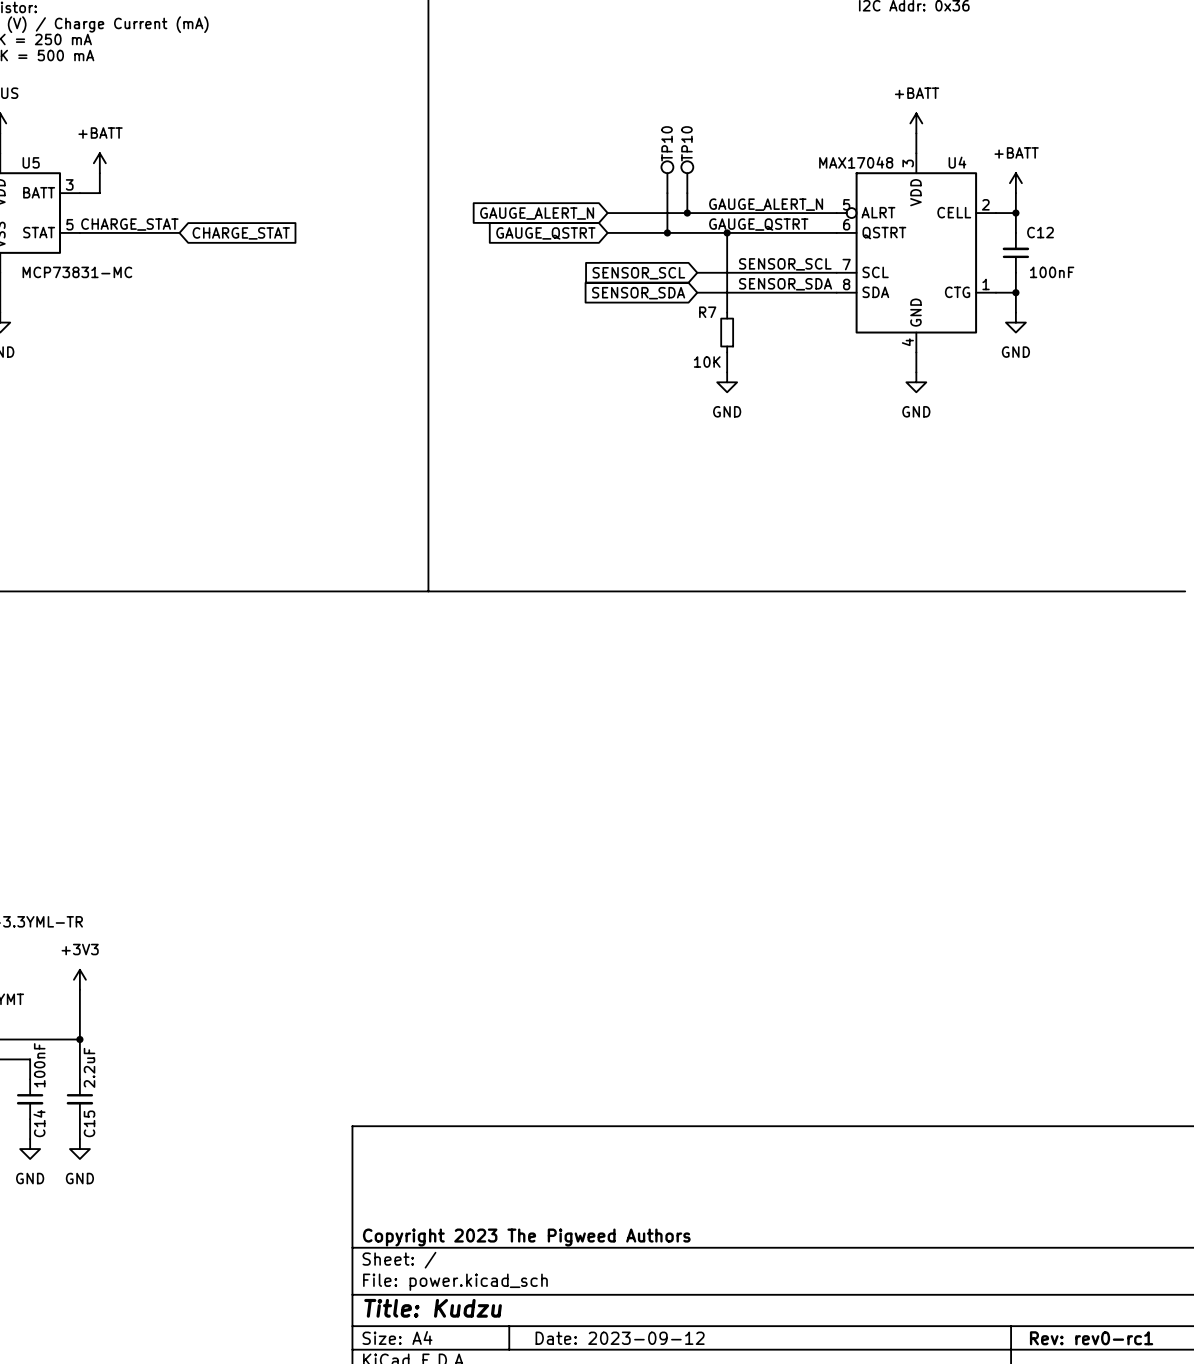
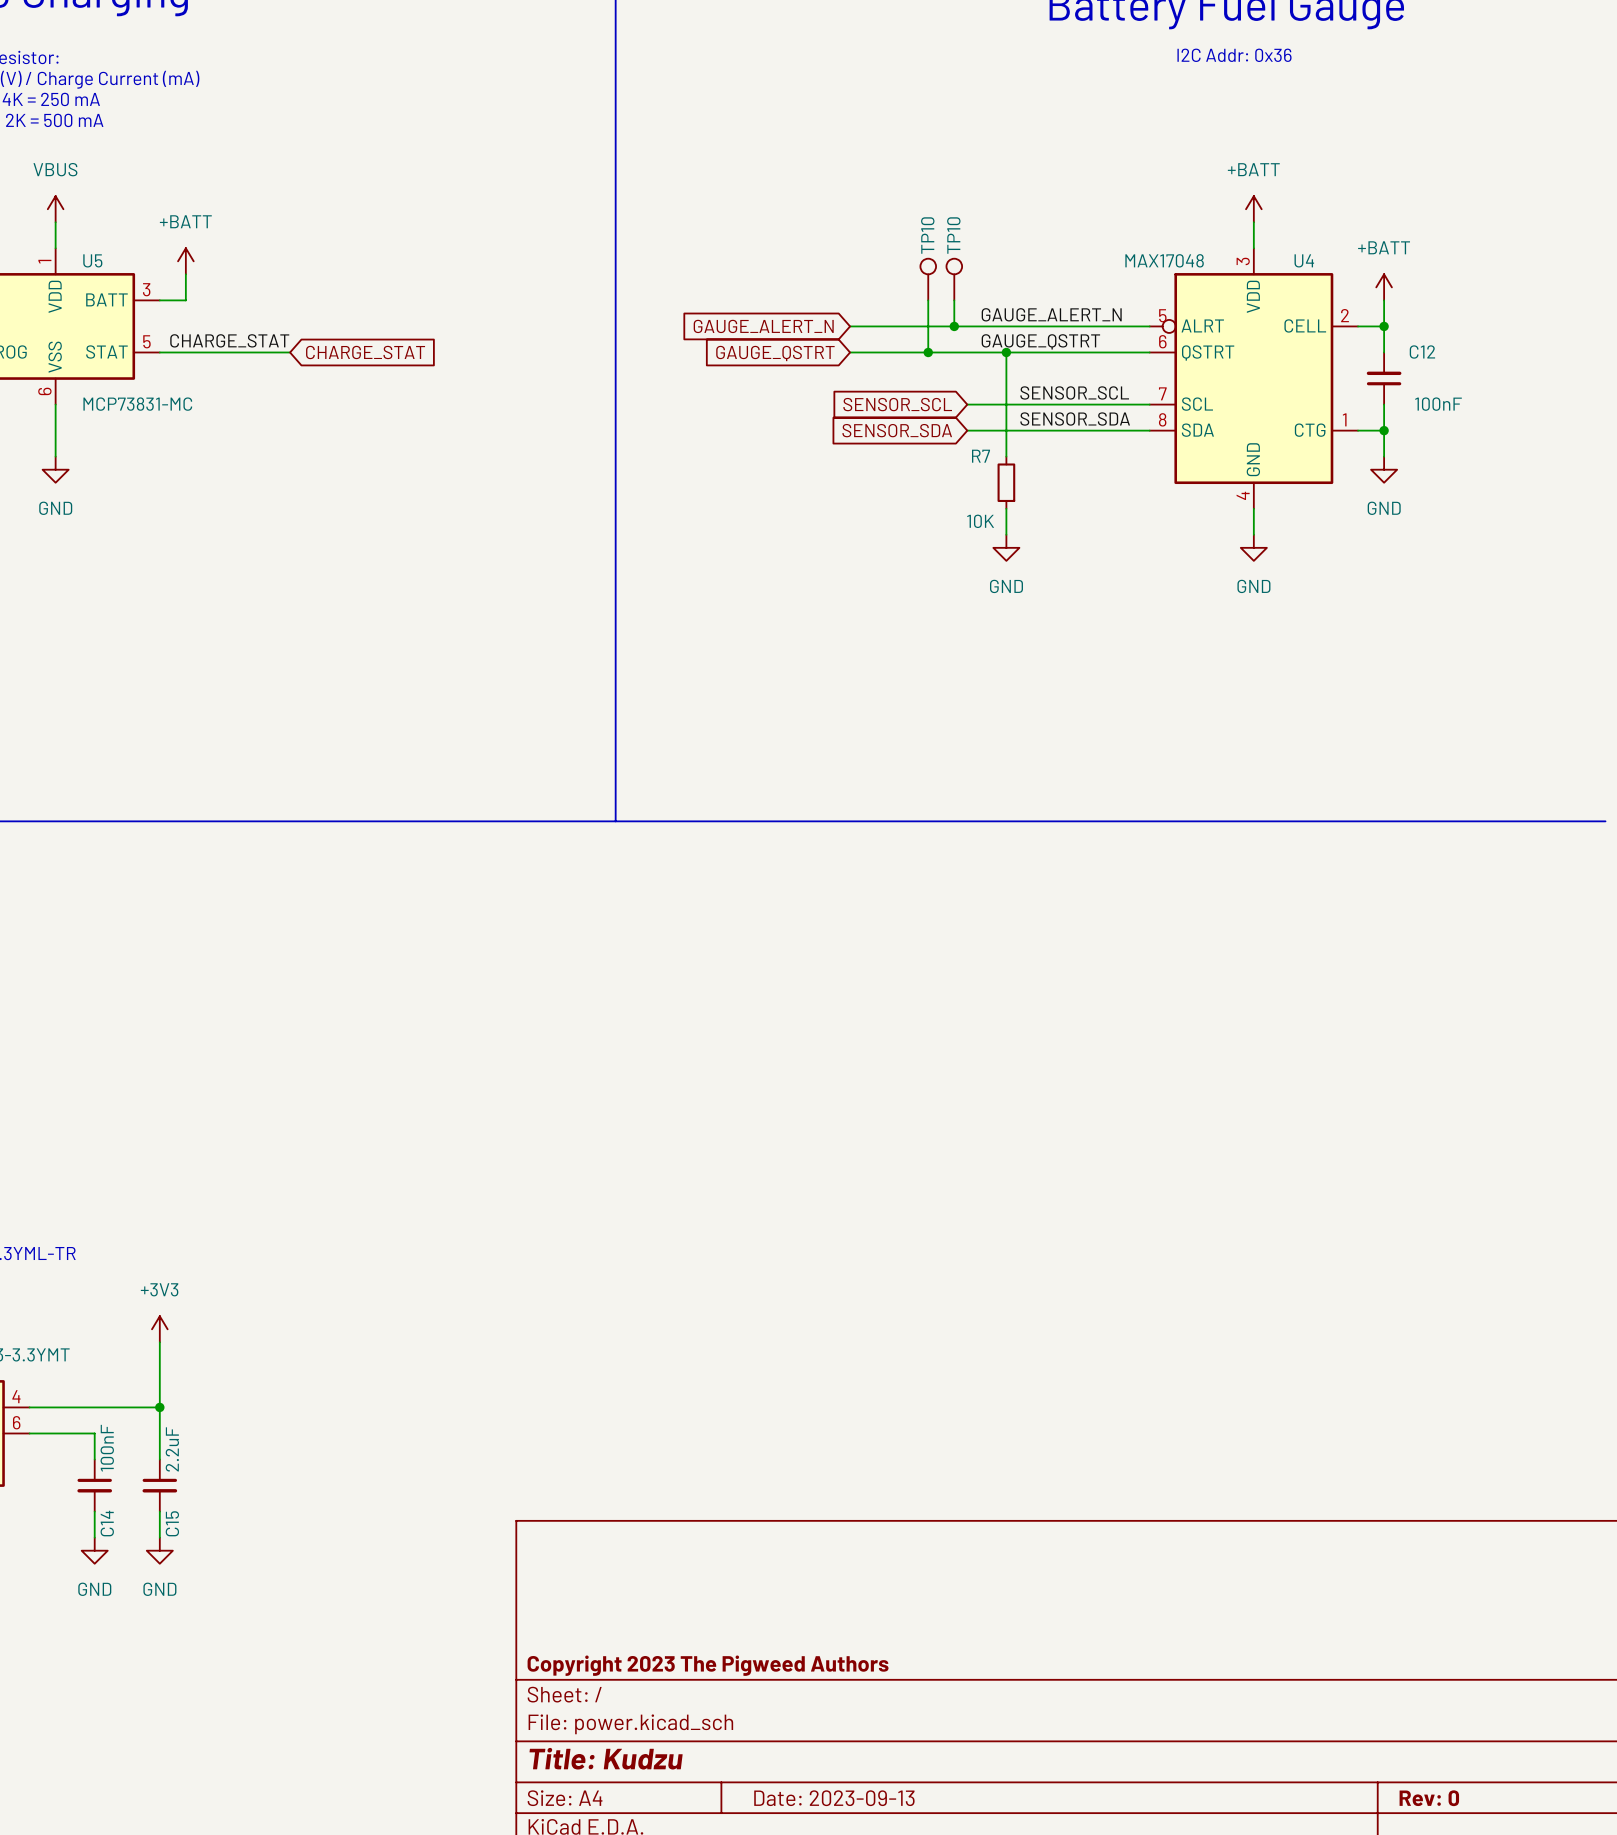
title block: Date: 2023-09-12 (620, 1338) -> Date: 2023-09-13 (834, 1798)
title block: Rev: rev0-rc1 (1091, 1338) -> Rev: 0 (1429, 1798)

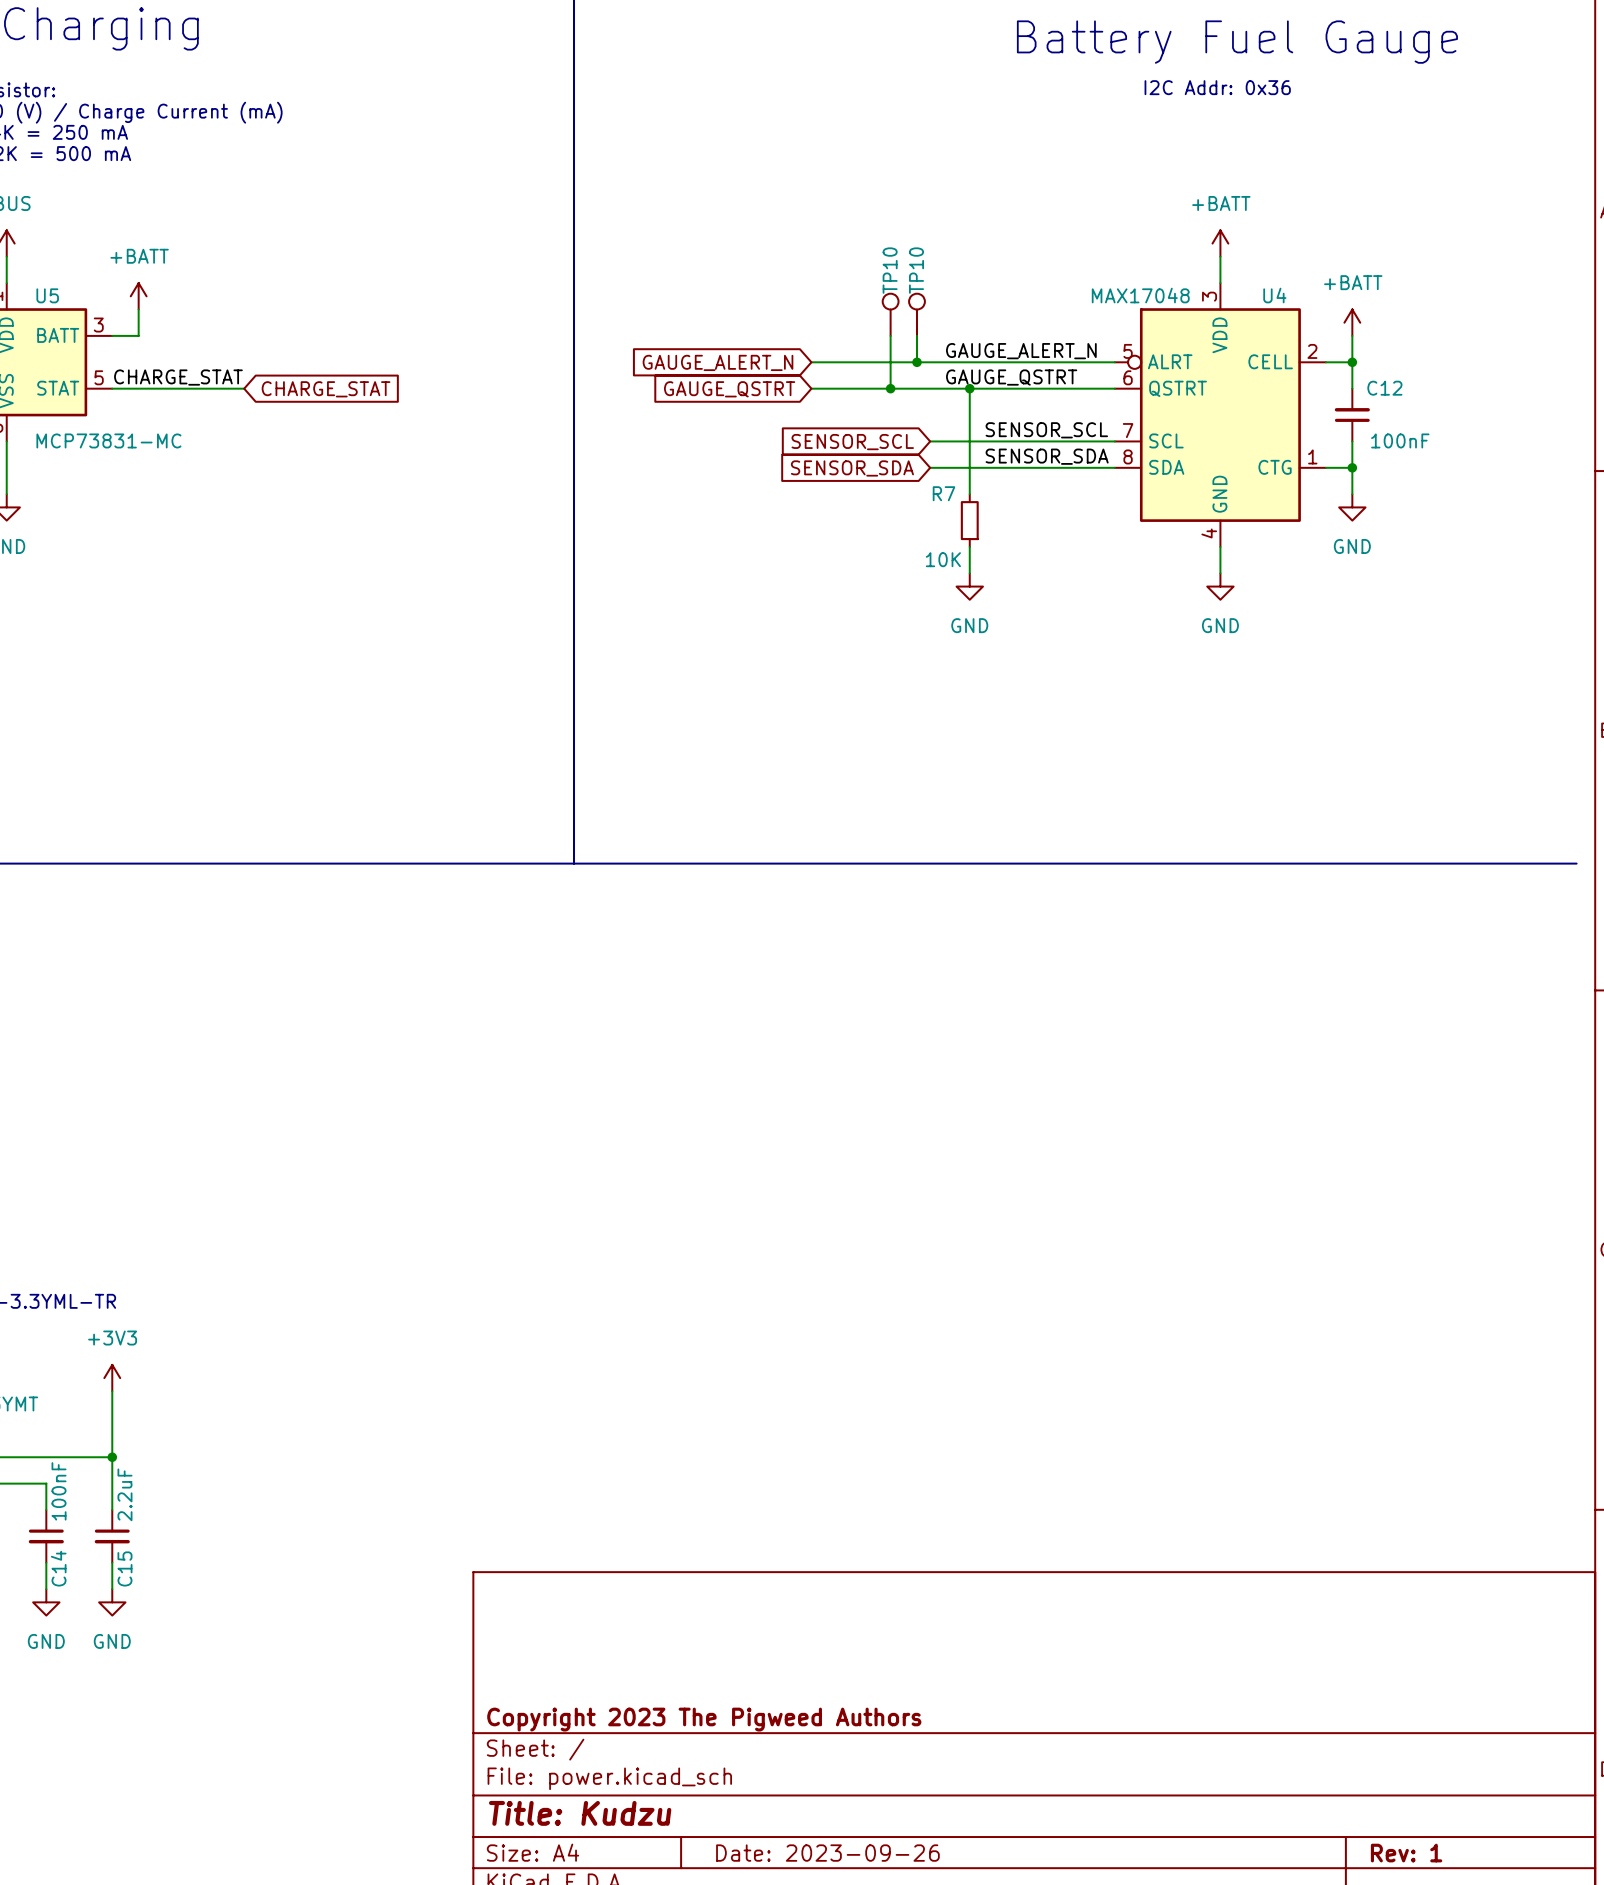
title block: Date: 2023-09-13 (834, 1798) -> Date: 2023-09-26 (827, 1853)
title block: Rev: 0 (1429, 1798) -> Rev: 1 (1406, 1853)

